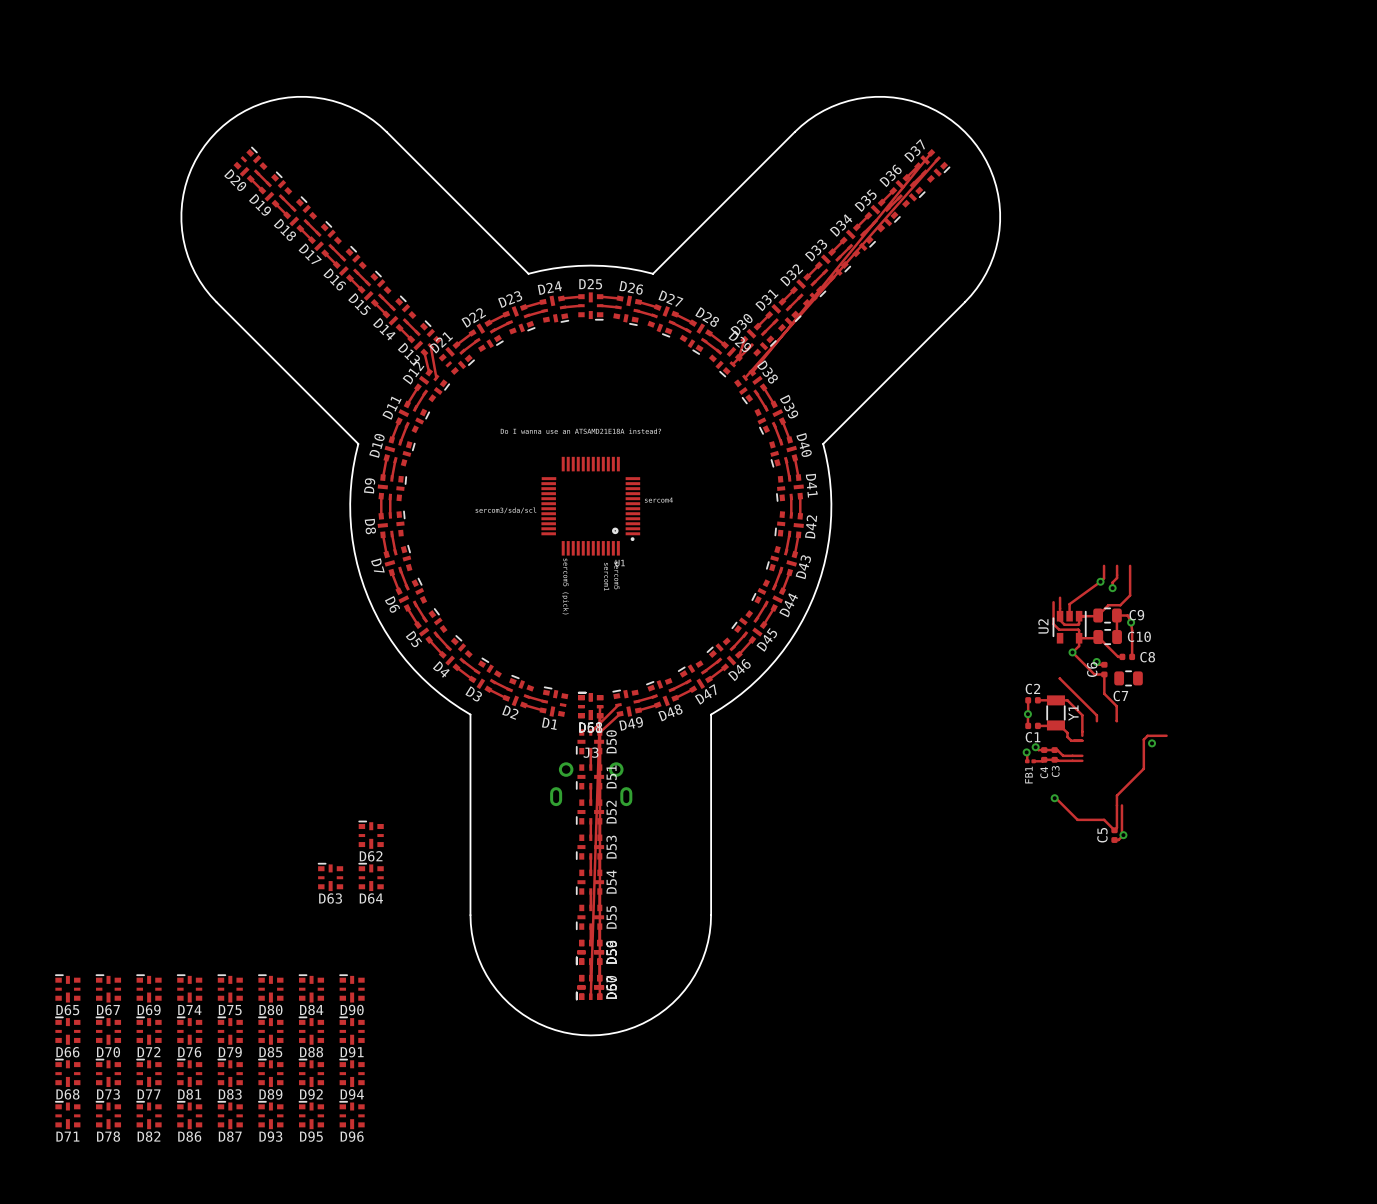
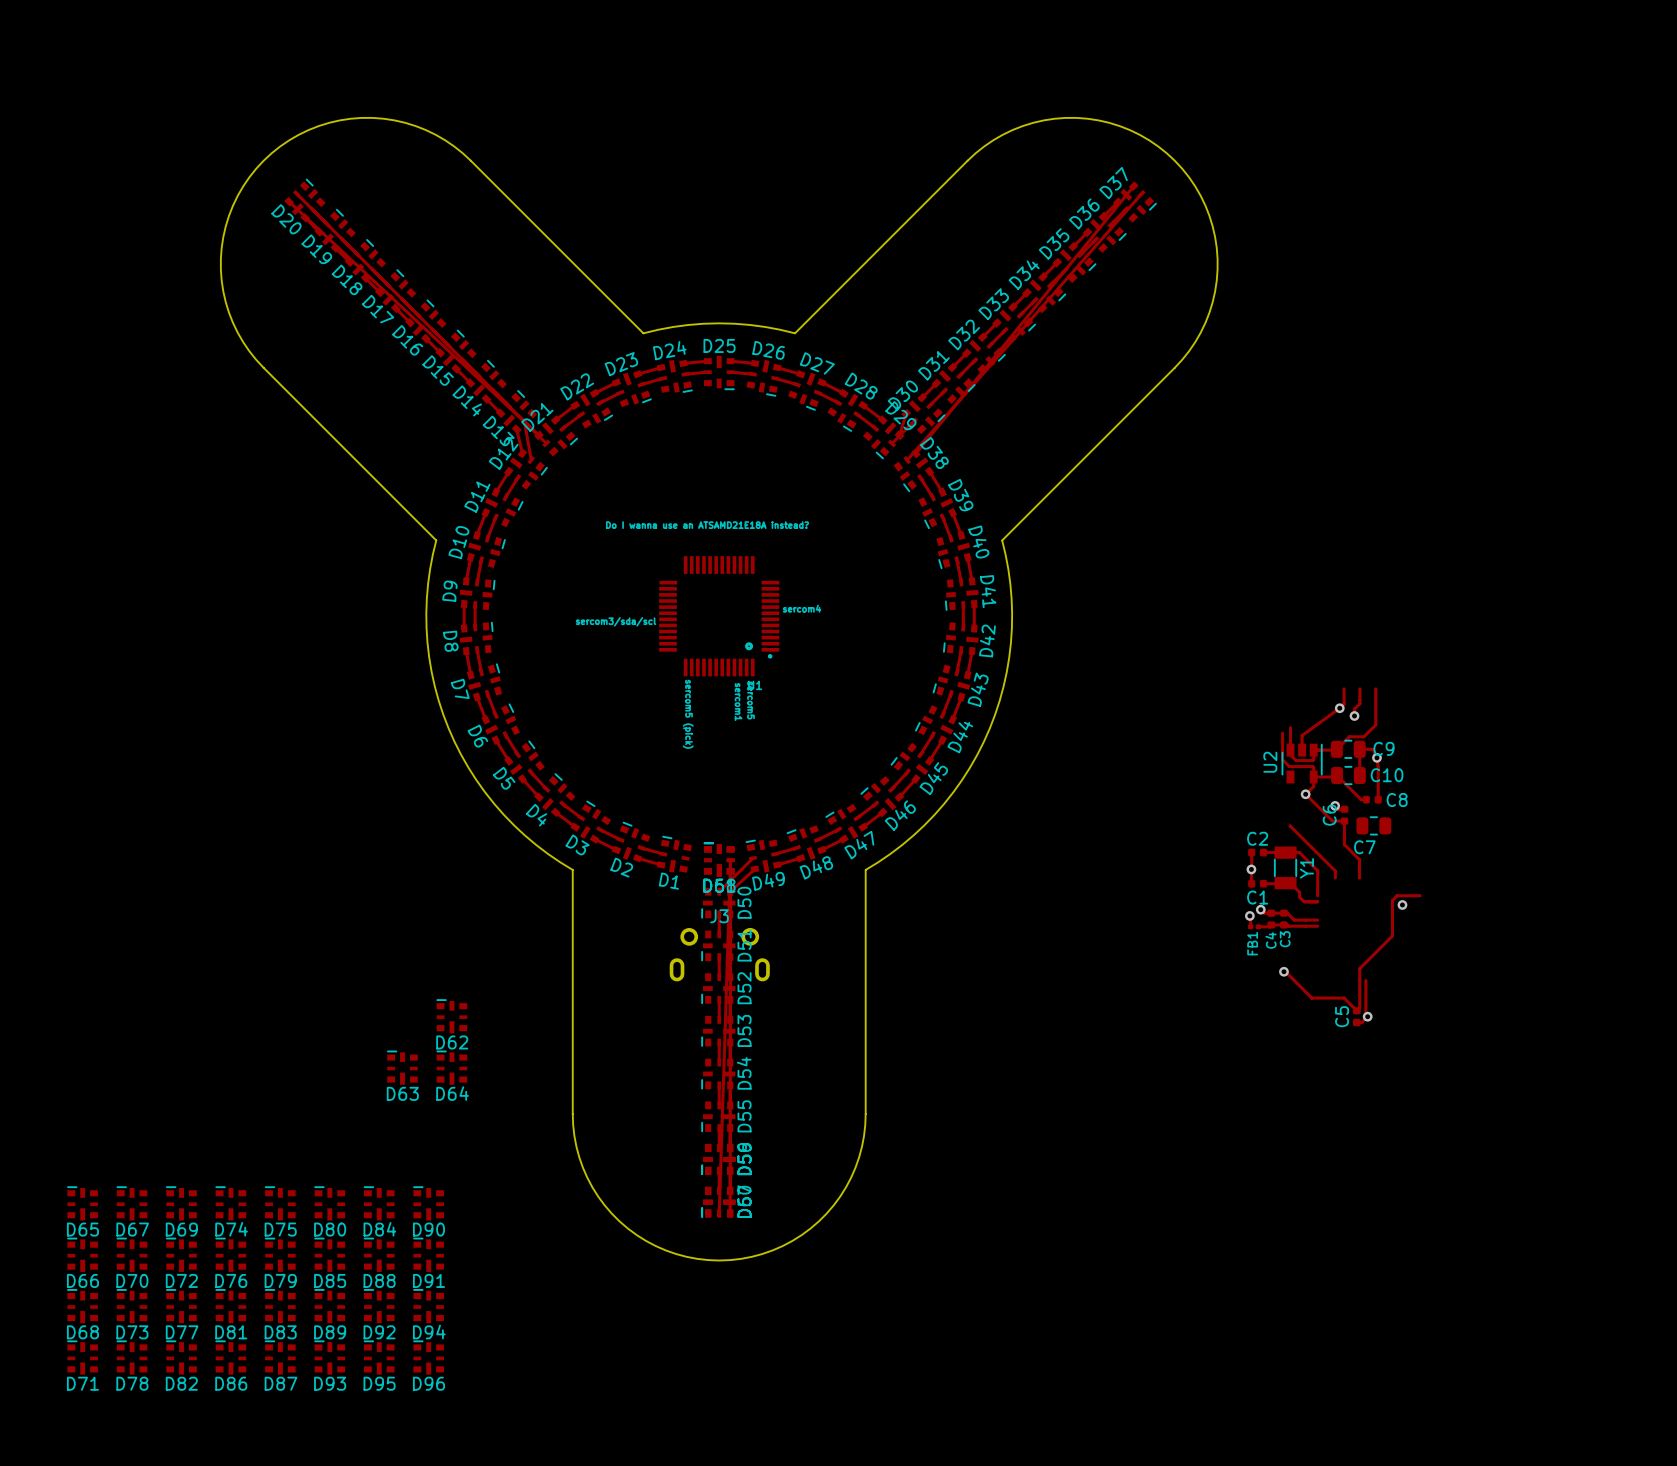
track: none -> (296, 193) (546, 443)
track: none -> (289, 201) (538, 435)

